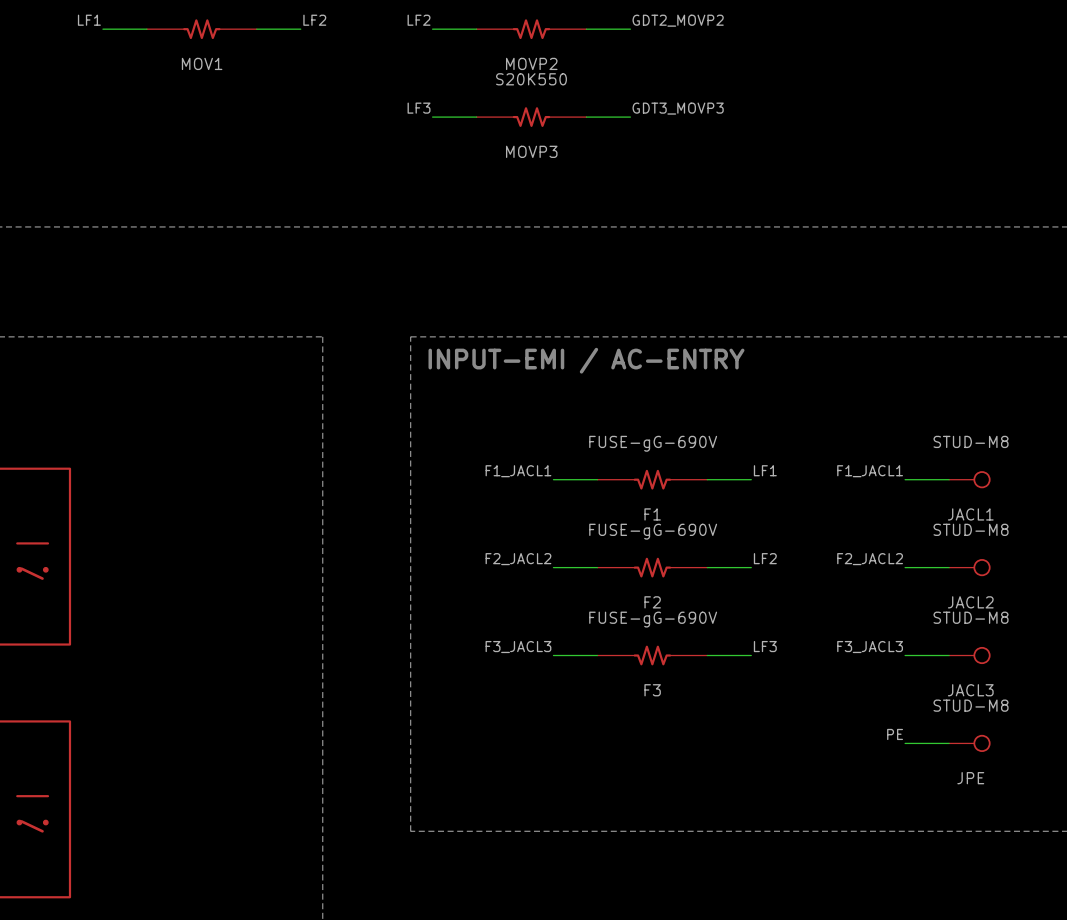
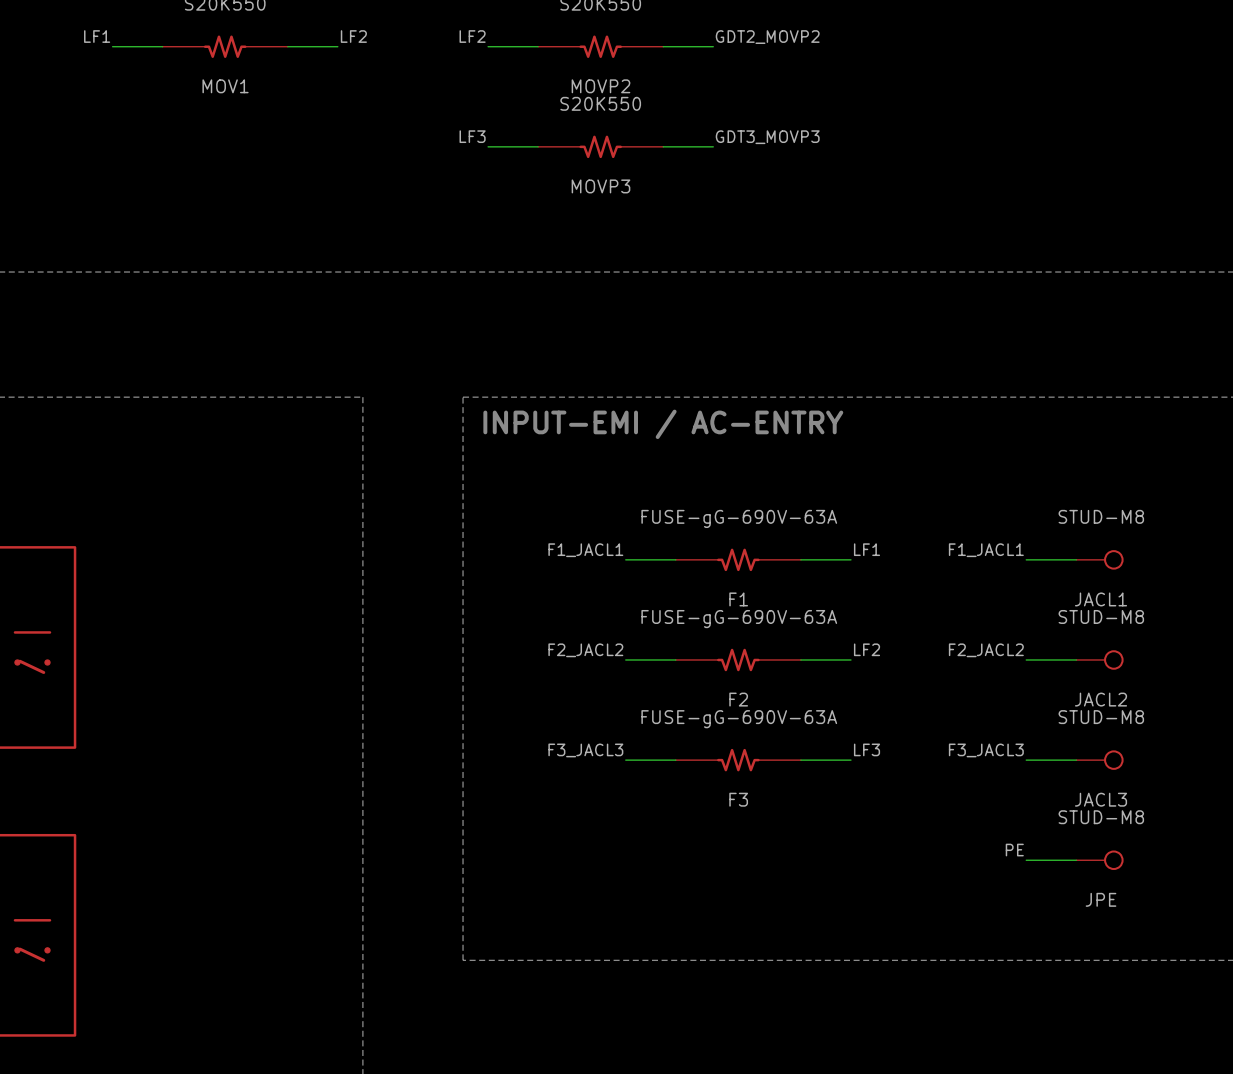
F1 value: FUSE-gG-690V (653, 443) -> FUSE-gG-690V-63A (739, 518)
F2 value: FUSE-gG-690V (653, 531) -> FUSE-gG-690V-63A (739, 619)
F3 value: FUSE-gG-690V (653, 619) -> FUSE-gG-690V-63A (739, 719)

